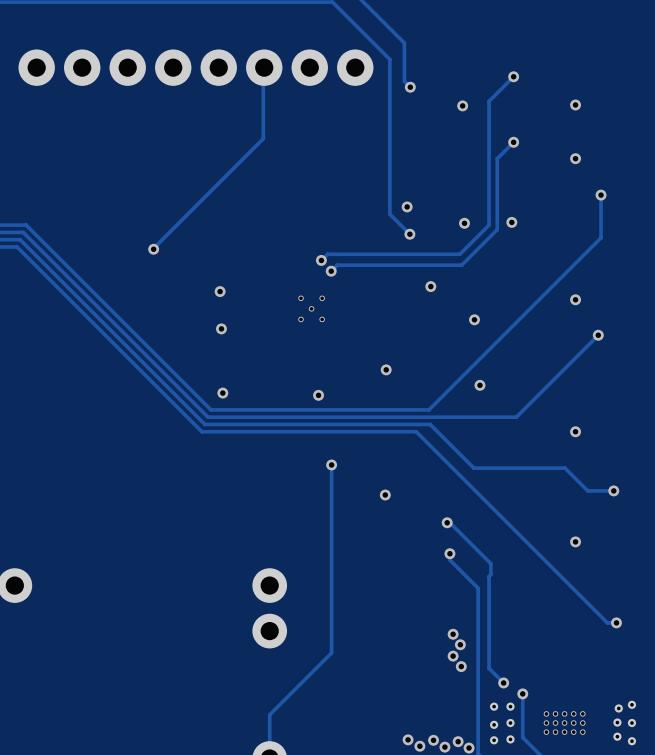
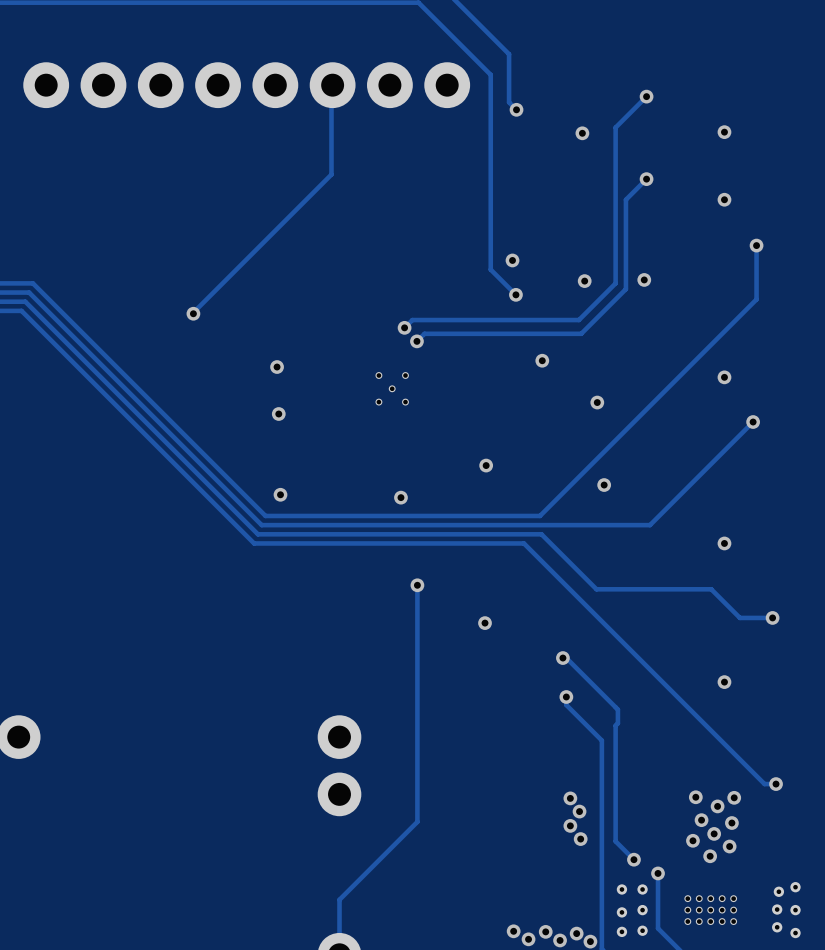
via: none -> (695, 797)
via: none -> (734, 797)
via: none -> (717, 806)
via: none -> (701, 820)
via: none -> (731, 823)
via: none -> (714, 833)
via: none -> (692, 840)
via: none -> (729, 846)
via: none -> (710, 856)

